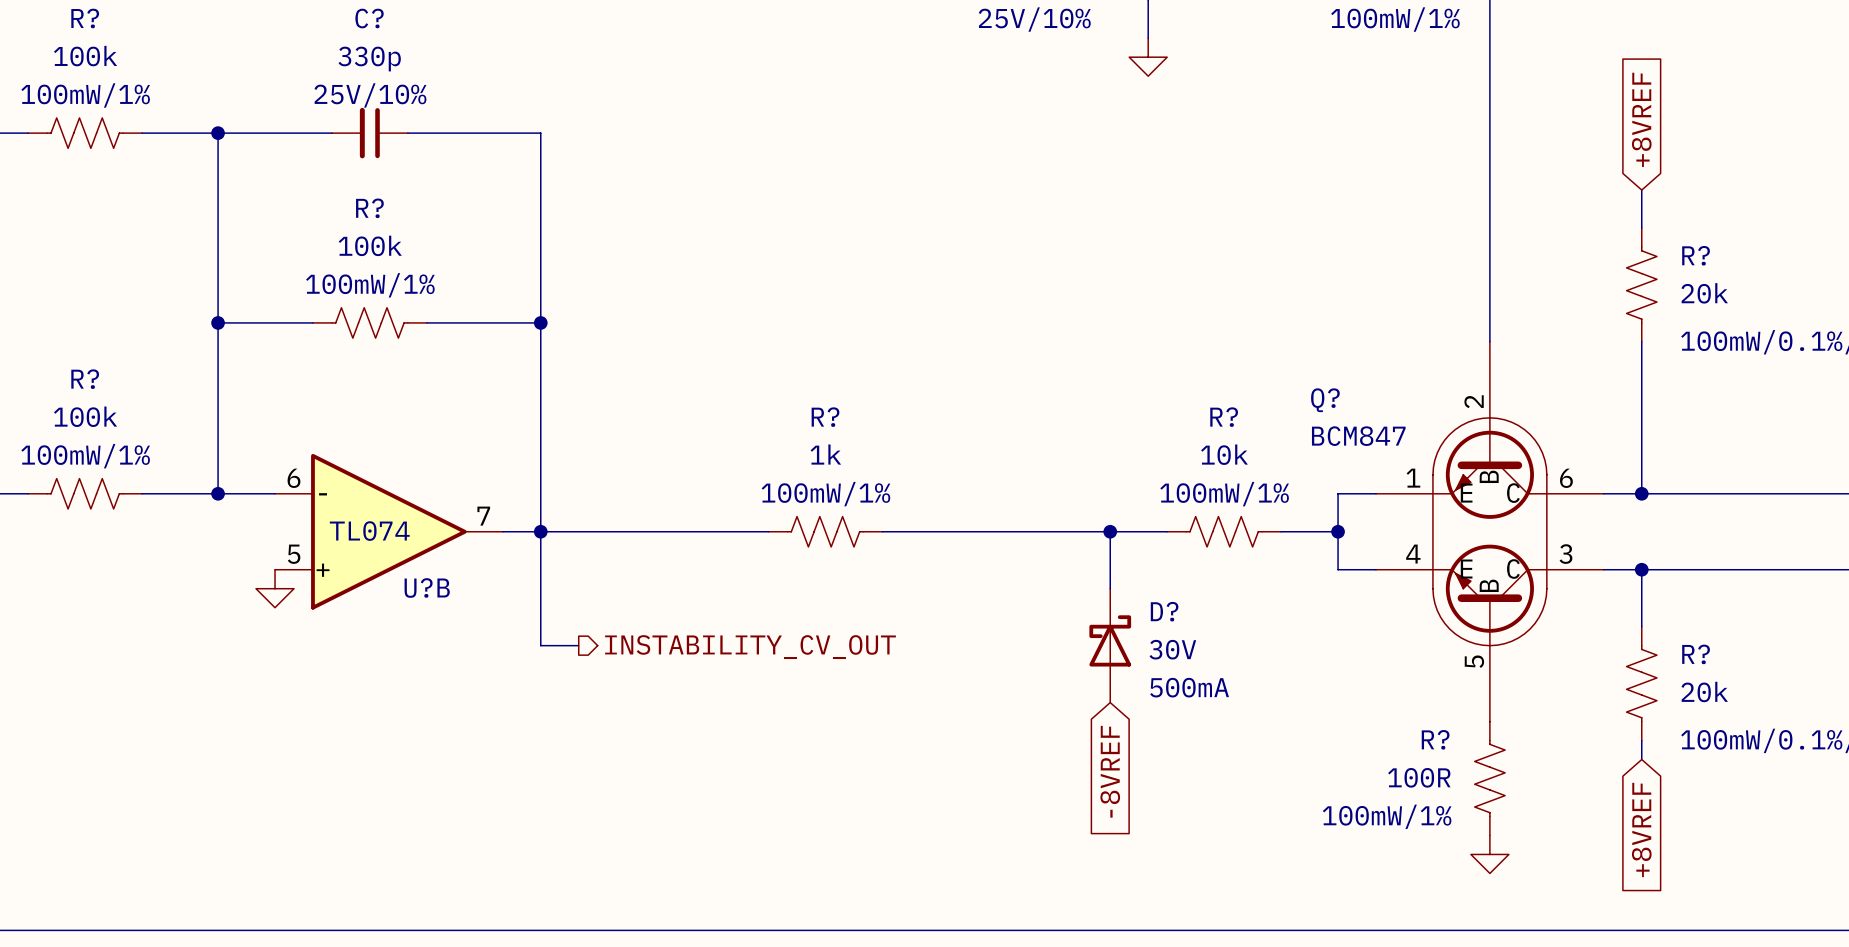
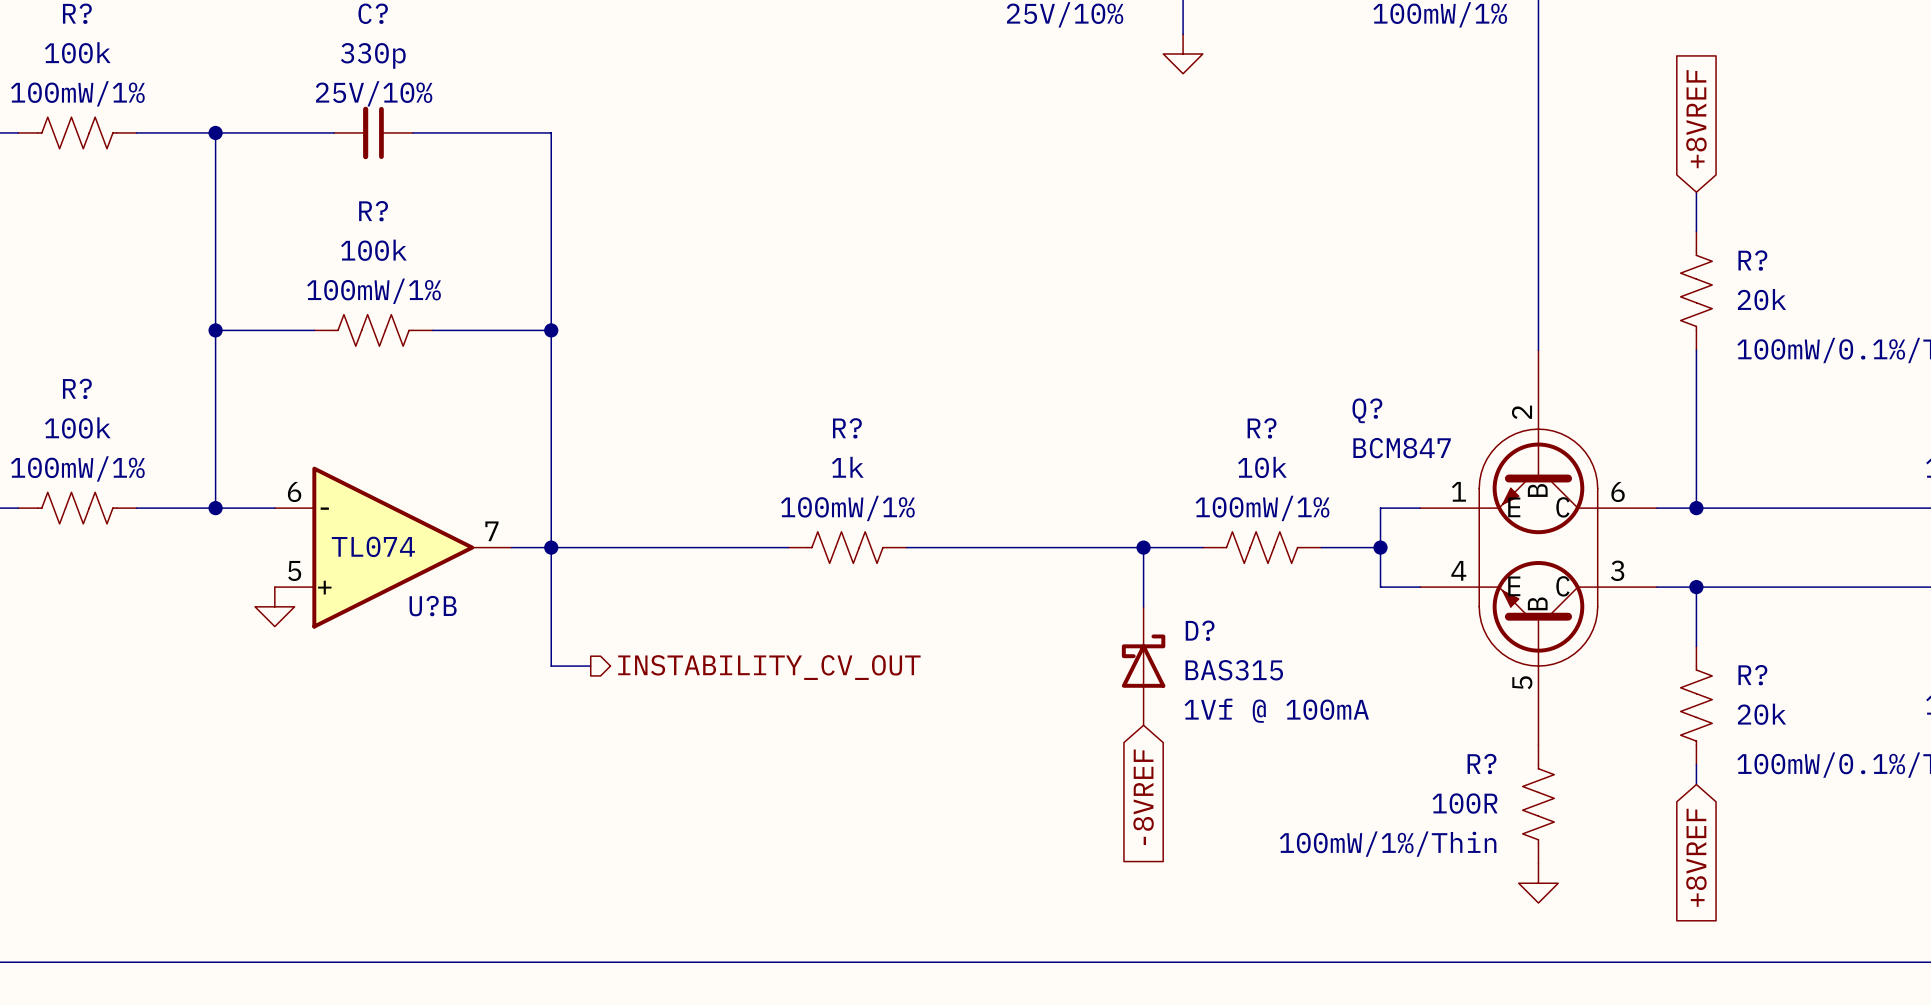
D? value: 30V (1172, 649) -> BAS315 (1234, 670)
D? text: 500mA (1189, 687) -> 1Vf @ 100mA (1276, 710)
R? text: 100mW/1% (1387, 816) -> 100mW/1%/Thin (1388, 844)

